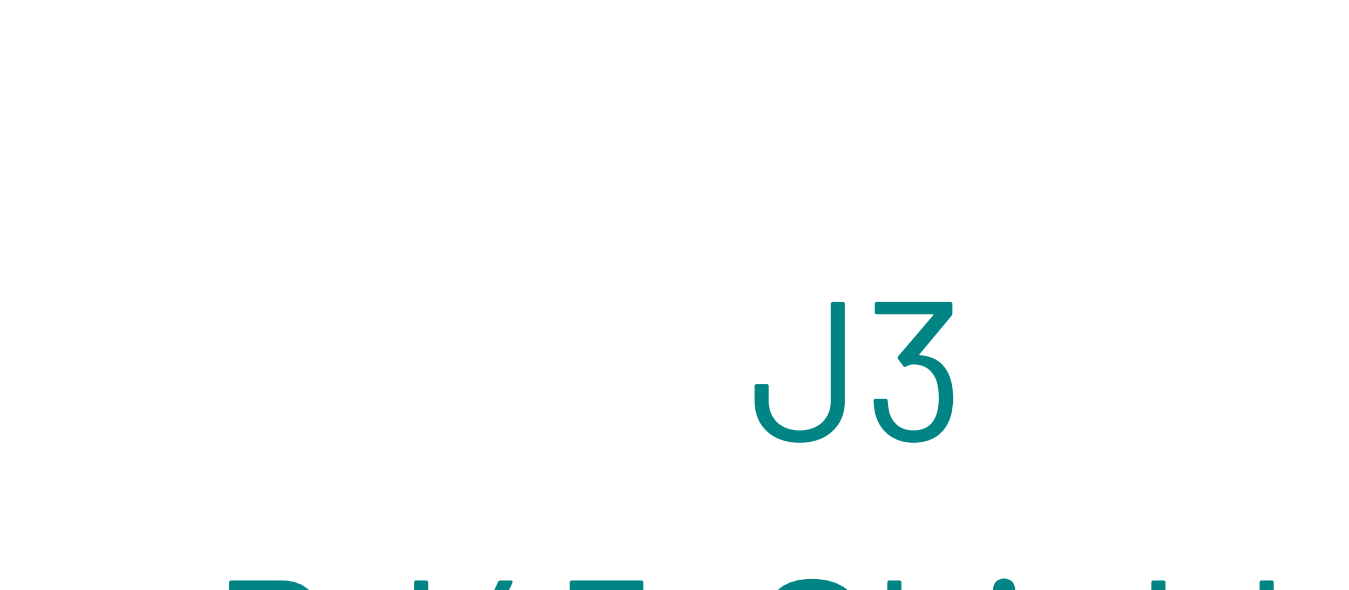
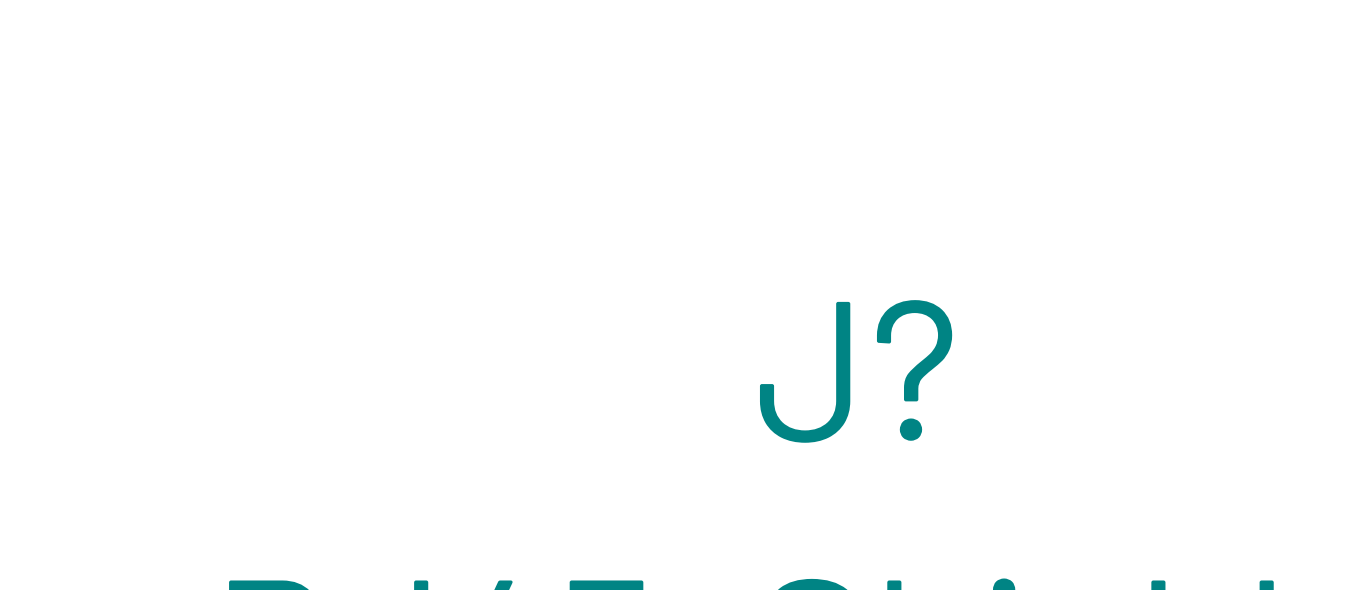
J3 name: J3 (853, 372) -> J? (856, 371)

